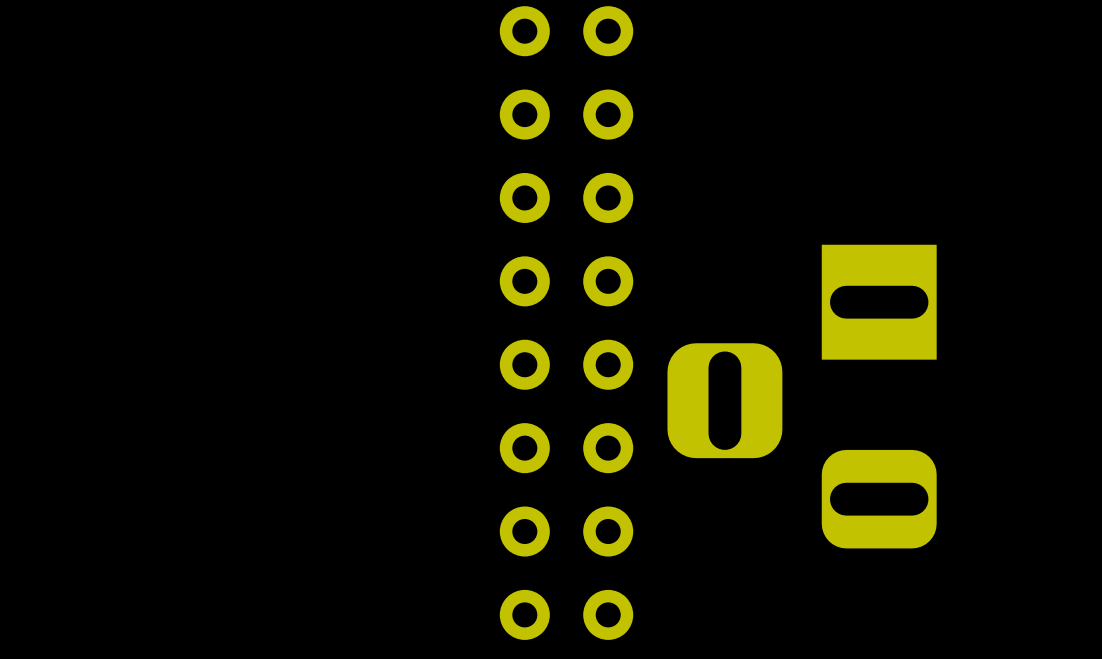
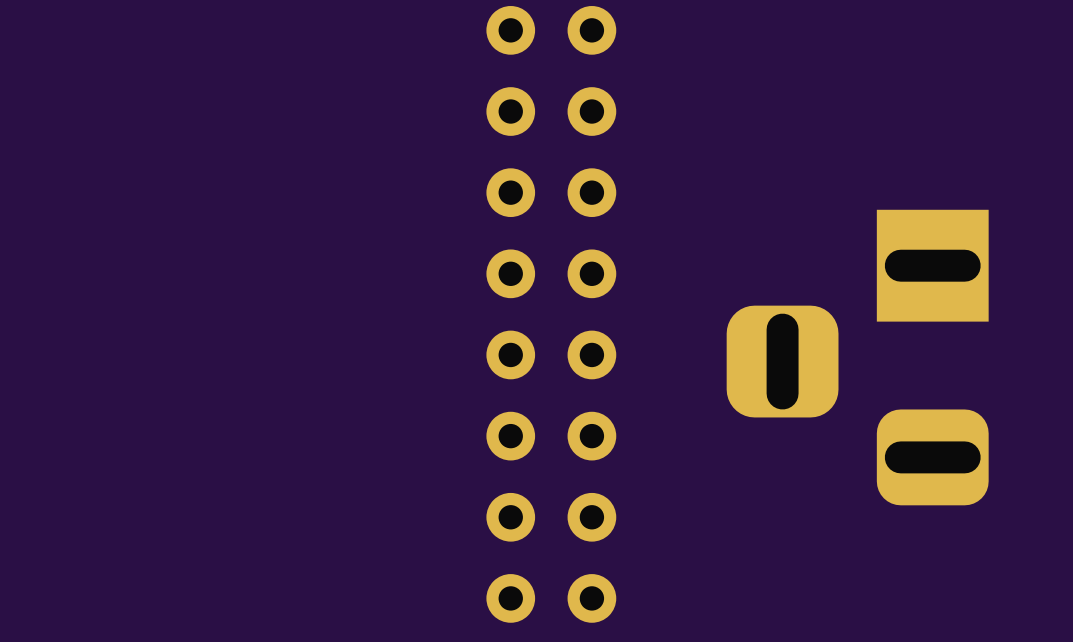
part position: (802, 396) -> (857, 357)

